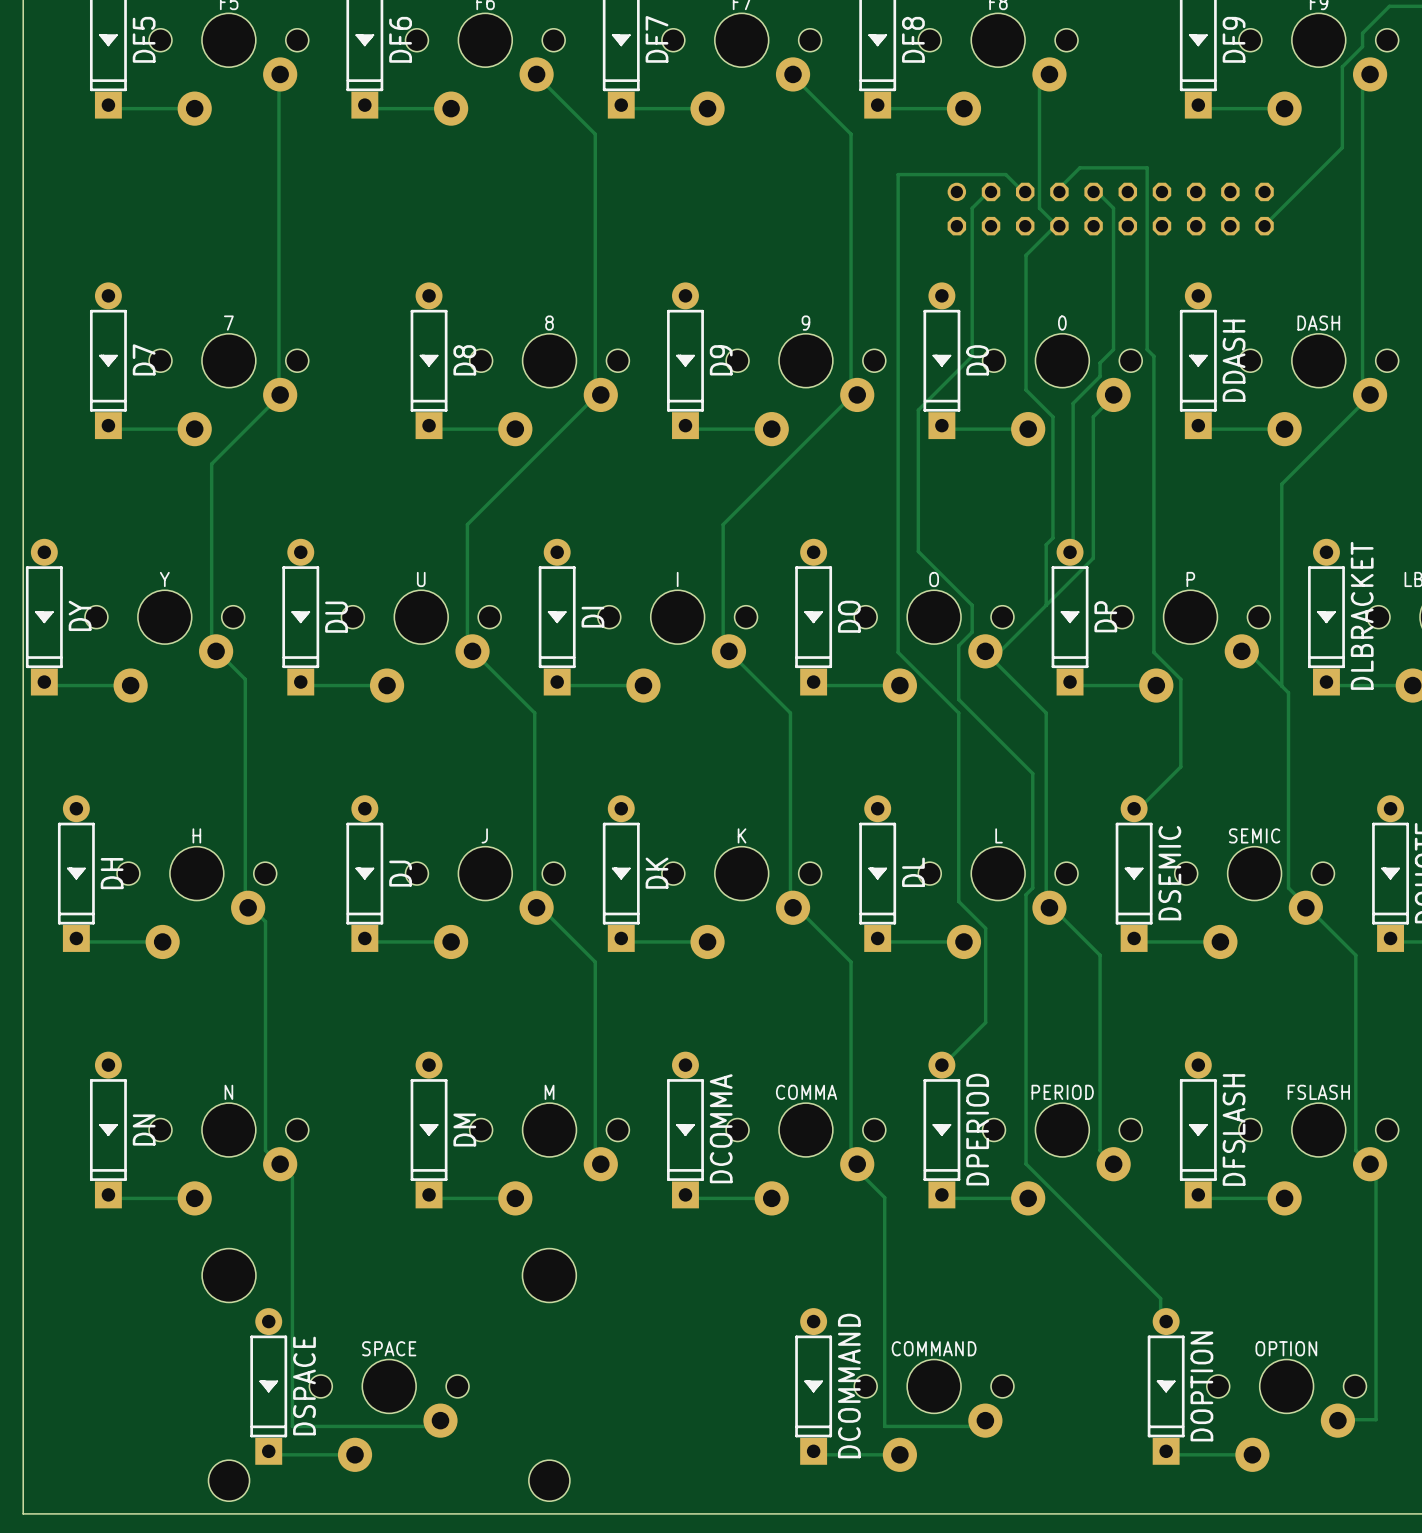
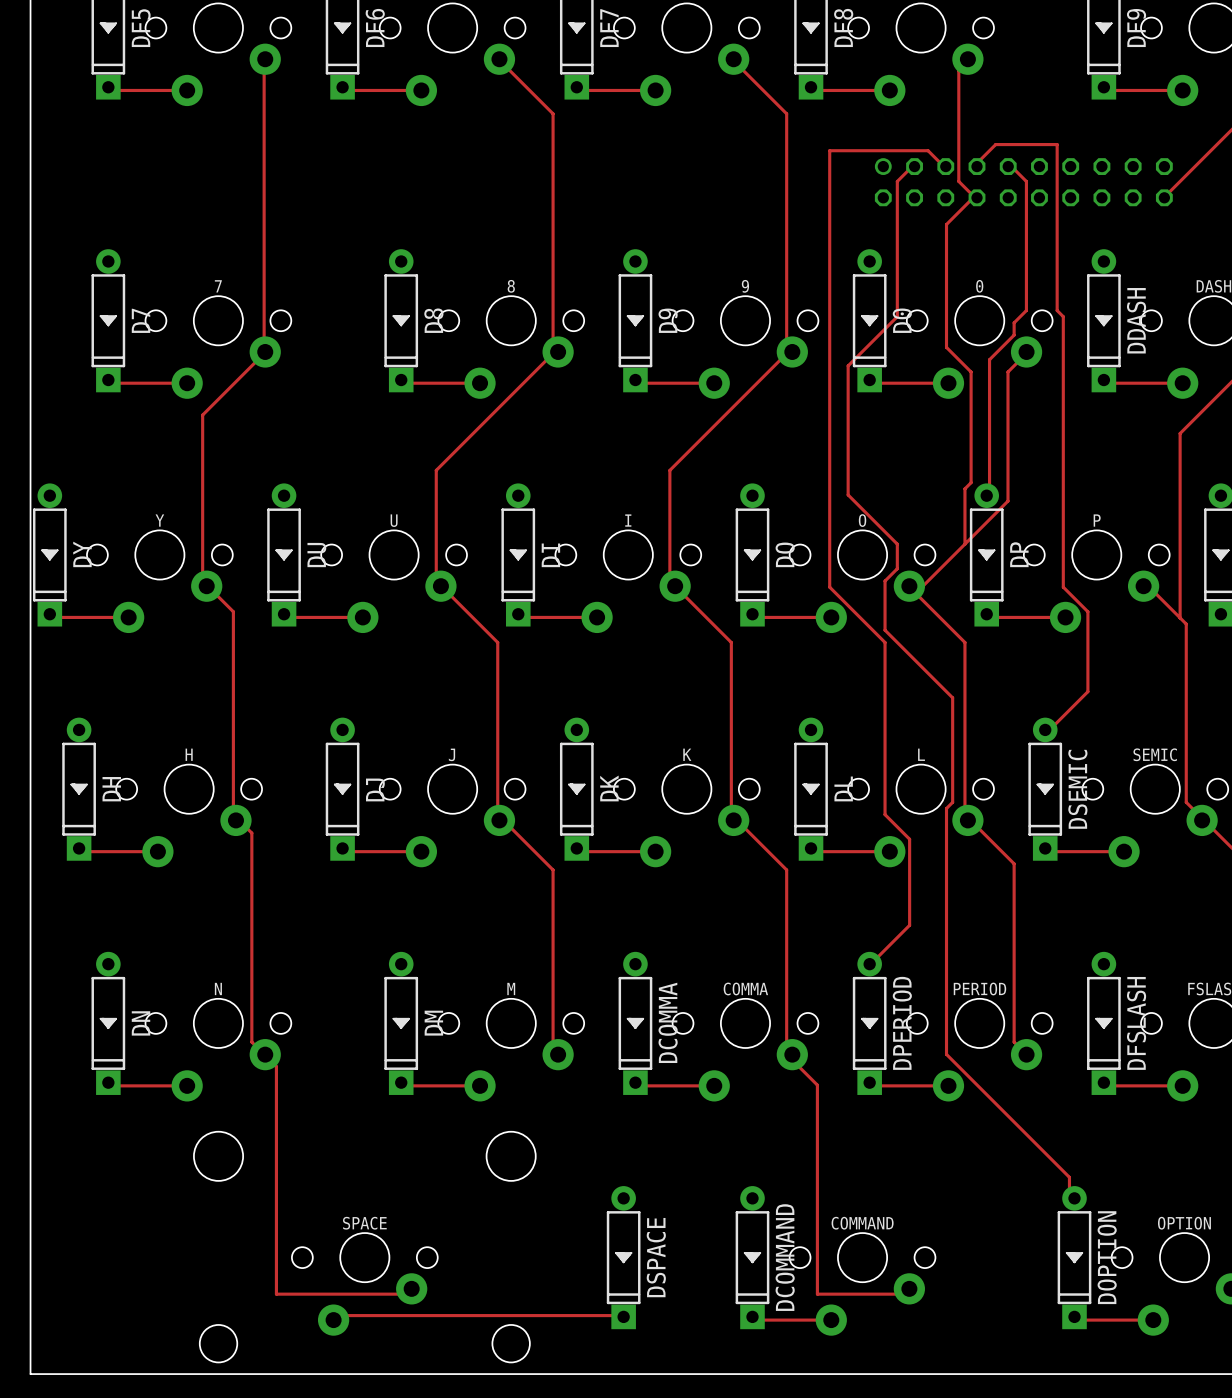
DSPACE: (268, 1386) -> none
DSPACE: none -> (623, 1257)
track: (268, 1451) (272, 1454) (355, 1454) -> (623, 1316) (620, 1320) (615, 1315) (338, 1315) (333, 1320)

